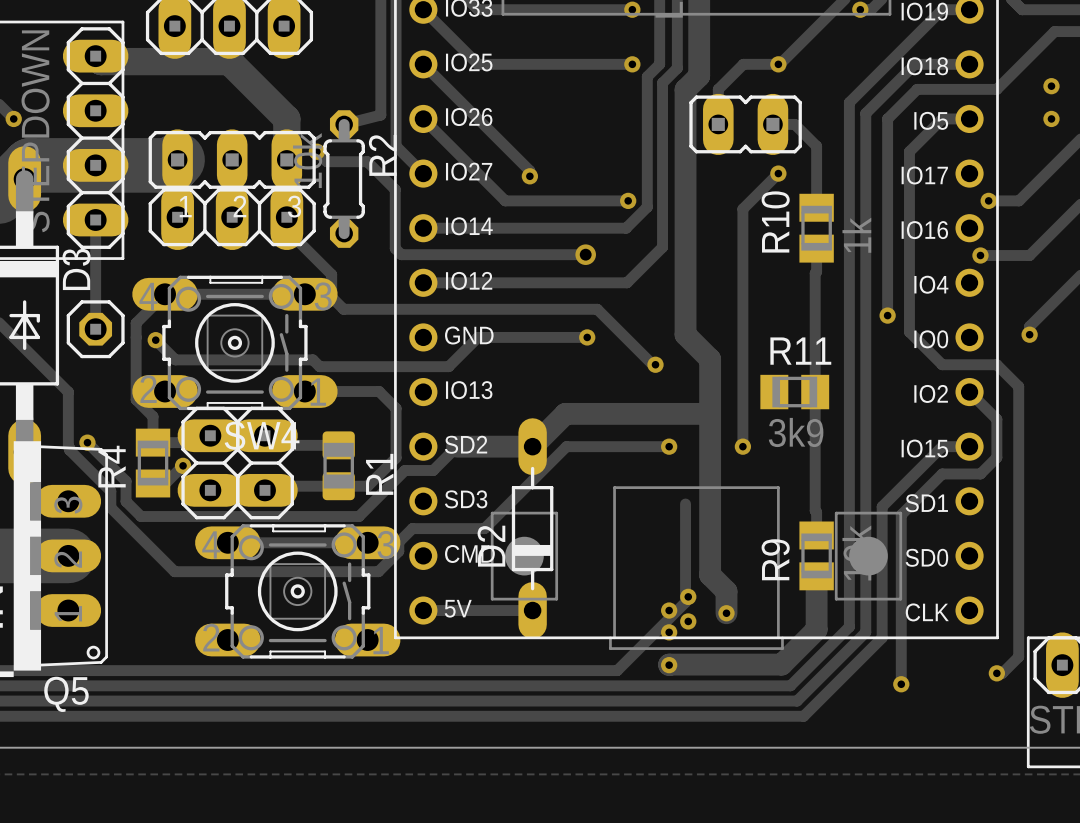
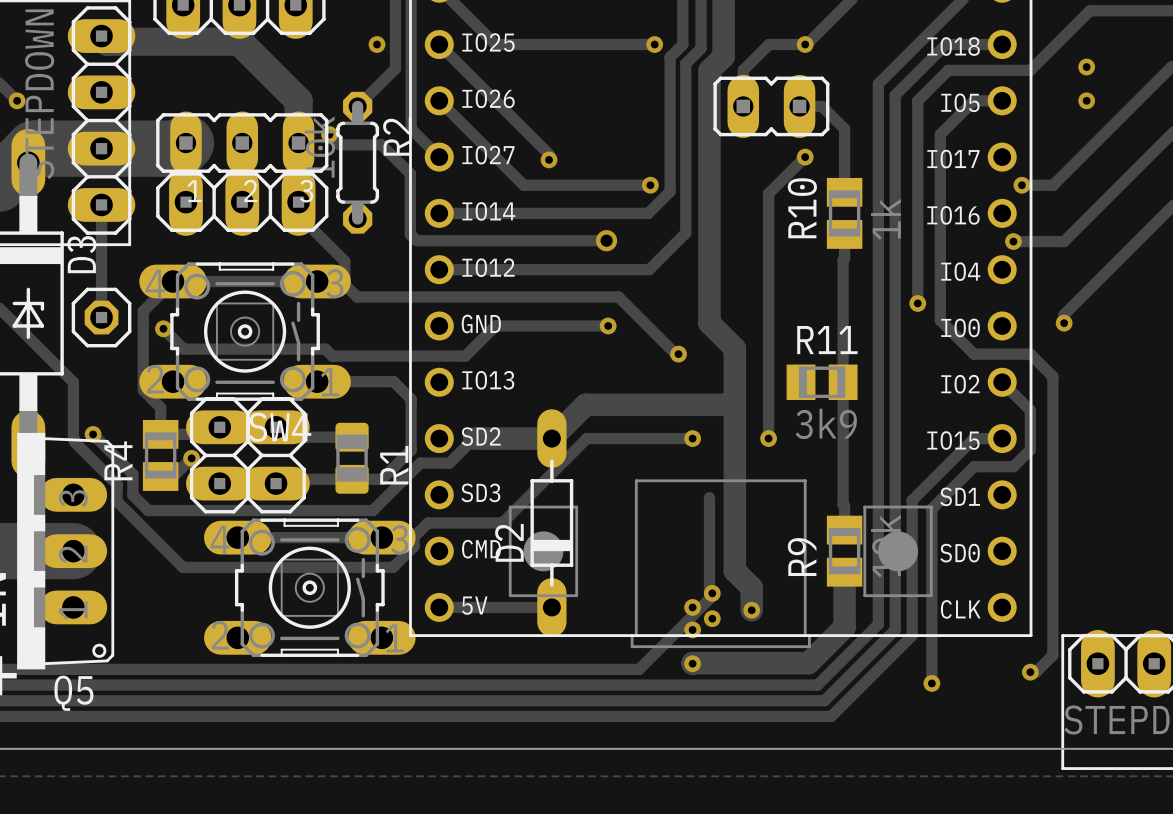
via: none -> (377, 44)
track: (380, 87) (380, 115) (344, 124) -> (395, 68) (357, 106)

